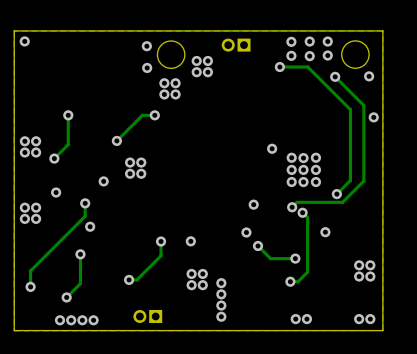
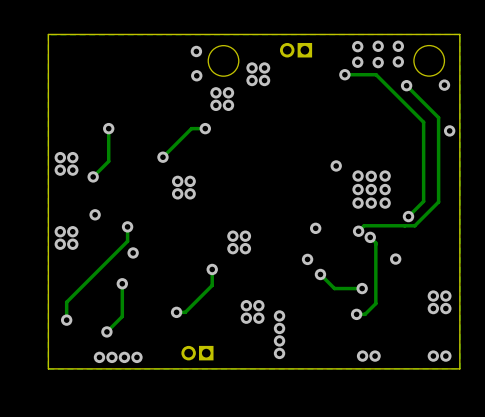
via: (24, 41) -> none
via: (103, 181) -> none
via: none -> (232, 236)
via: none -> (245, 236)
via: none -> (232, 248)
via: none -> (245, 248)
via: (190, 241) -> none

